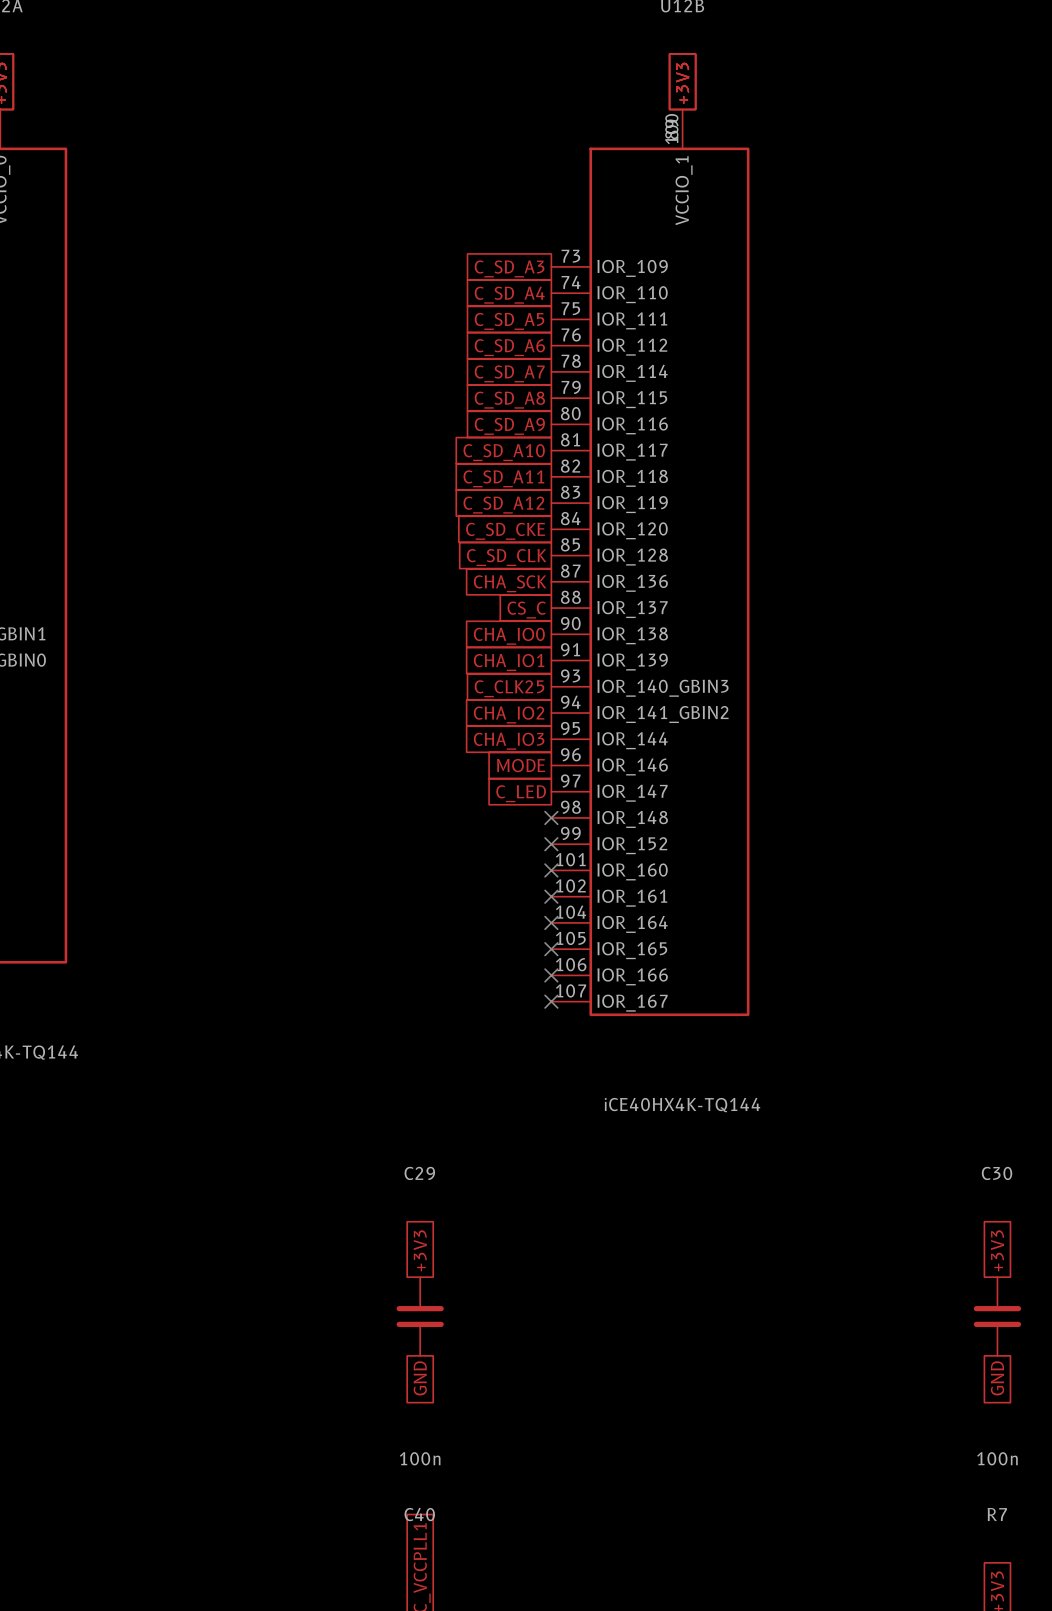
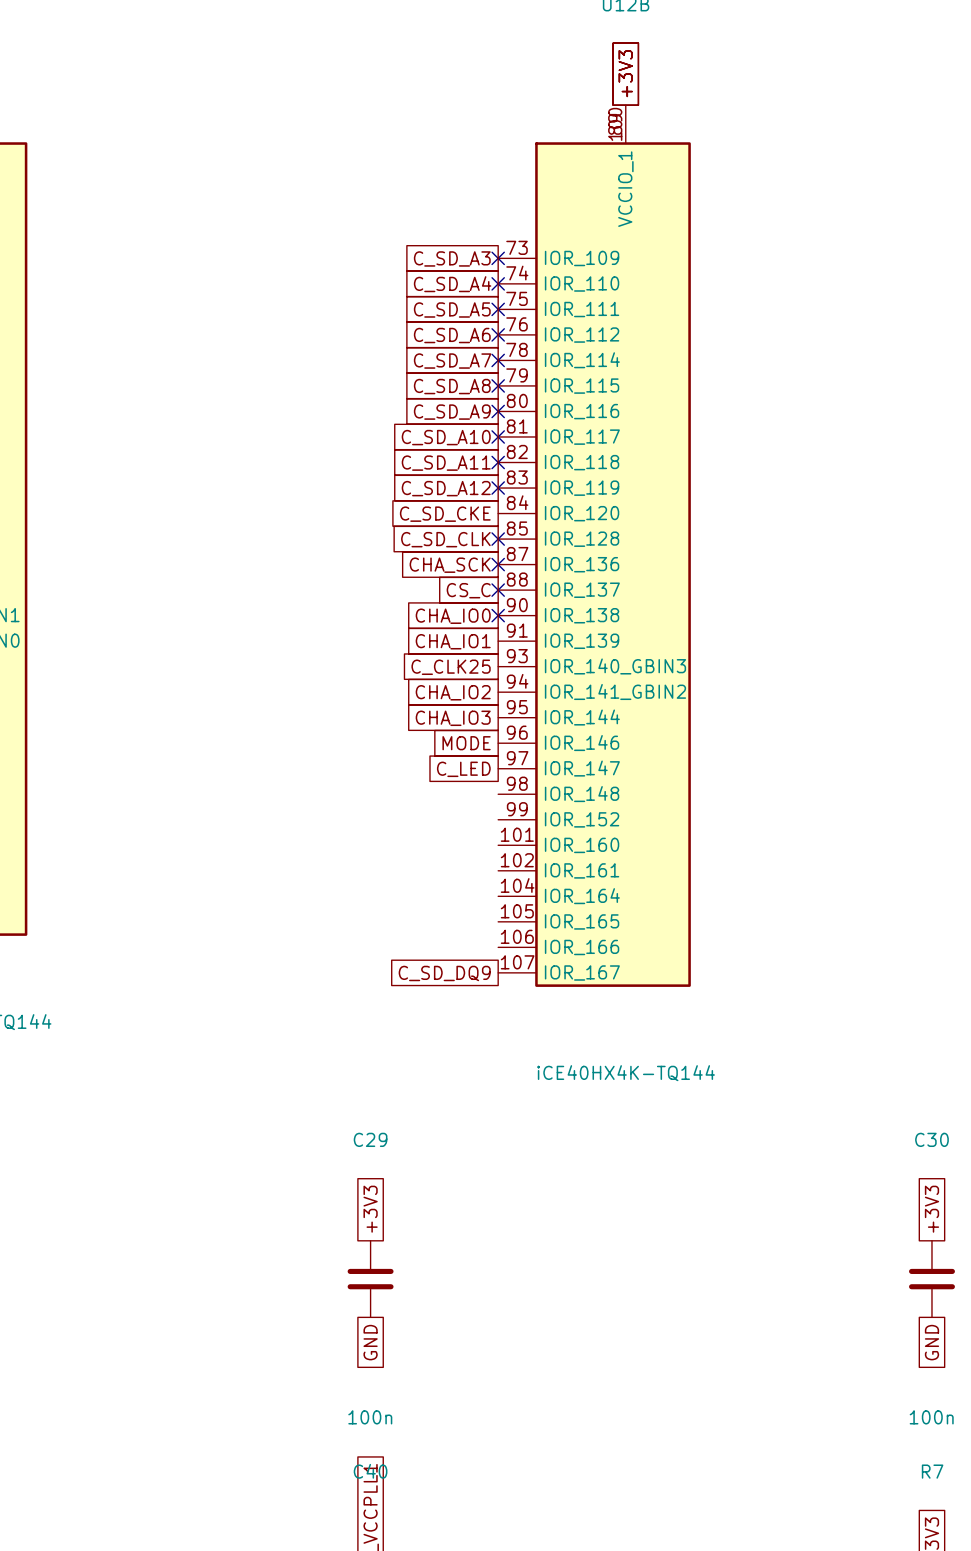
no-connect mark: none -> (498, 258)
no-connect mark: none -> (498, 283)
no-connect mark: none -> (498, 309)
no-connect mark: none -> (498, 334)
no-connect mark: none -> (498, 360)
no-connect mark: none -> (498, 385)
no-connect mark: none -> (498, 411)
no-connect mark: none -> (498, 436)
no-connect mark: none -> (498, 462)
no-connect mark: none -> (498, 488)
no-connect mark: none -> (498, 539)
no-connect mark: none -> (498, 564)
no-connect mark: none -> (498, 590)
no-connect mark: none -> (498, 615)
no-connect mark: (551, 817) -> none
no-connect mark: (551, 844) -> none
no-connect mark: (551, 870) -> none
no-connect mark: (551, 896) -> none
no-connect mark: (551, 922) -> none
no-connect mark: (551, 949) -> none
no-connect mark: (551, 975) -> none
no-connect mark: (551, 1001) -> none
global label: none -> C_SD_DQ9 (444, 973)

